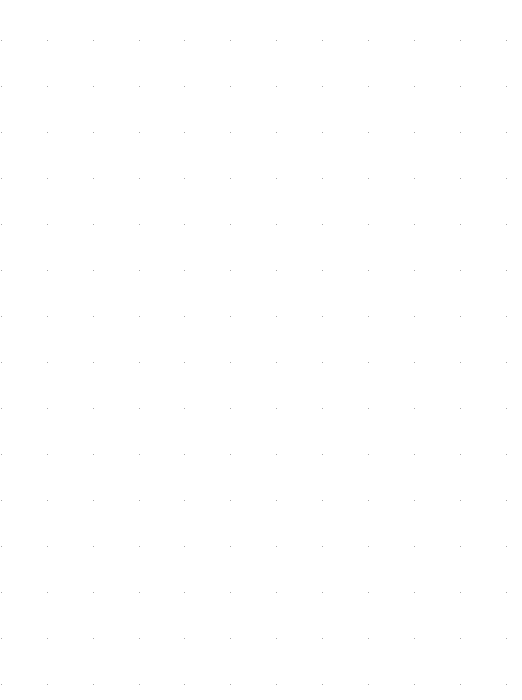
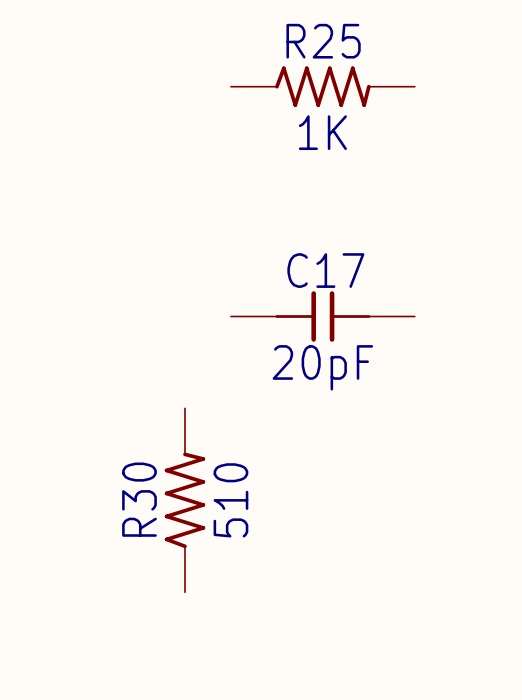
R25: none -> 1K (322, 86)
C17: none -> 20pF (322, 316)
R30: none -> 510 (184, 500)

